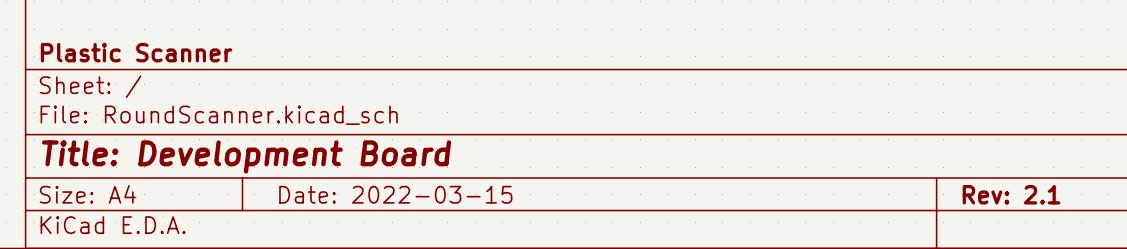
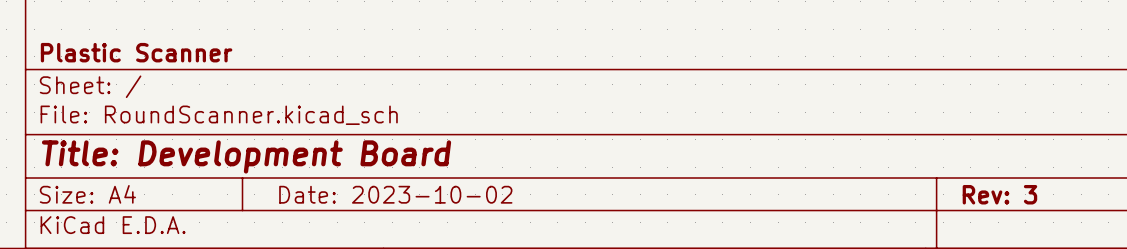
title block: Date: 2022-03-15 (395, 194) -> Date: 2023-10-02 (395, 194)
title block: Rev: 2.1 (1011, 194) -> Rev: 3 (999, 194)

